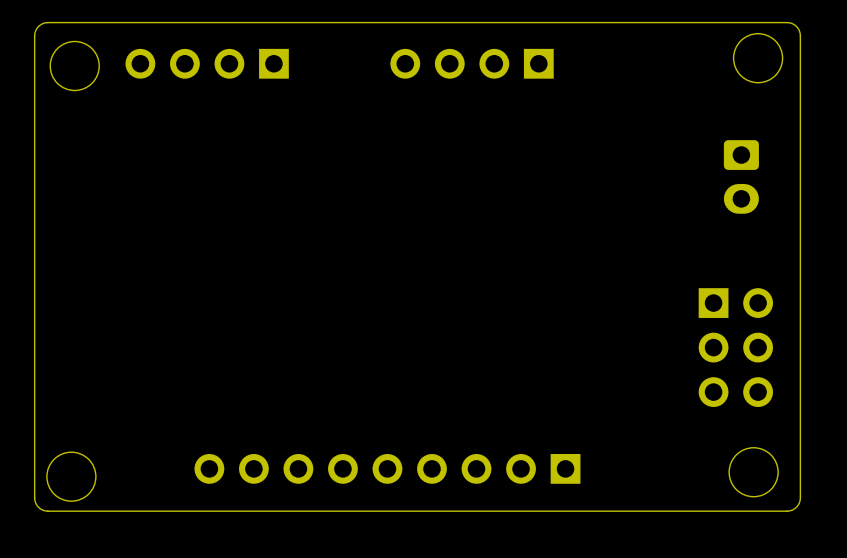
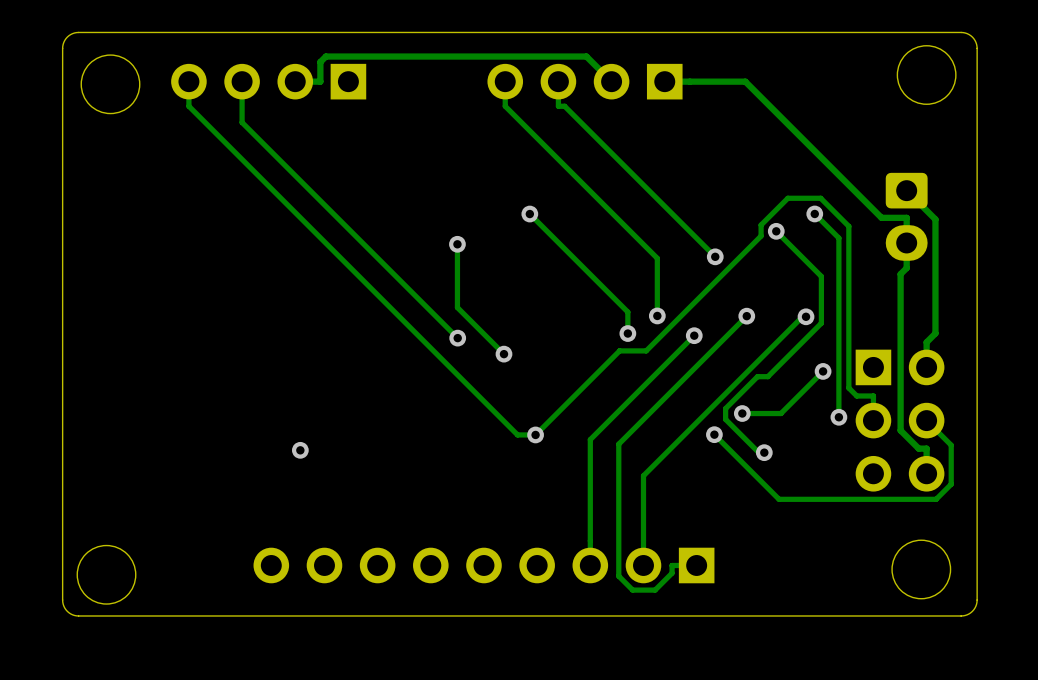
track: none -> (188, 81) (188, 106) (517, 434) (535, 434) (619, 350) (646, 350) (761, 236) (761, 225) (787, 198) (820, 198) (848, 226) (848, 388) (856, 395) (873, 395) (873, 420)
track: none -> (242, 81) (242, 122) (457, 338)
track: none -> (505, 81) (505, 106) (657, 258) (657, 315)
track: none -> (558, 81) (558, 106) (564, 106) (715, 256)
track: none -> (611, 81) (586, 56) (325, 56) (320, 62) (320, 81) (295, 81)
track: none -> (664, 81) (745, 81) (881, 217) (906, 217) (906, 268) (900, 274) (900, 430) (918, 448) (926, 448) (926, 473)
track: none -> (906, 190) (935, 219) (935, 333) (926, 342) (926, 367)
track: none -> (529, 214) (627, 312) (627, 333)
via: none -> (529, 214)
track: none -> (814, 213) (838, 238) (838, 417)
via: none -> (814, 213)
track: none -> (776, 231) (821, 276) (821, 323) (767, 376) (757, 376) (725, 408) (725, 419) (758, 452) (764, 452)
via: none -> (776, 231)
track: none -> (457, 244) (457, 307) (503, 354)
via: none -> (457, 244)
via: none -> (715, 256)
via: none -> (657, 315)
track: none -> (746, 316) (618, 444) (618, 576) (632, 590) (655, 590) (672, 573) (672, 565) (696, 565)
via: none -> (746, 316)
track: none -> (806, 316) (802, 316) (643, 475) (643, 565)
via: none -> (806, 316)
via: none -> (627, 333)
track: none -> (694, 335) (590, 439) (590, 565)
via: none -> (694, 335)
via: none -> (457, 338)
via: none -> (503, 354)
track: none -> (823, 371) (780, 413) (742, 413)
via: none -> (823, 371)
via: none -> (742, 413)
via: none -> (838, 417)
track: none -> (926, 420) (951, 445) (951, 484) (936, 499) (779, 499) (714, 434)
via: none -> (535, 434)
via: none -> (714, 434)
via: none -> (300, 450)
via: none -> (764, 452)

